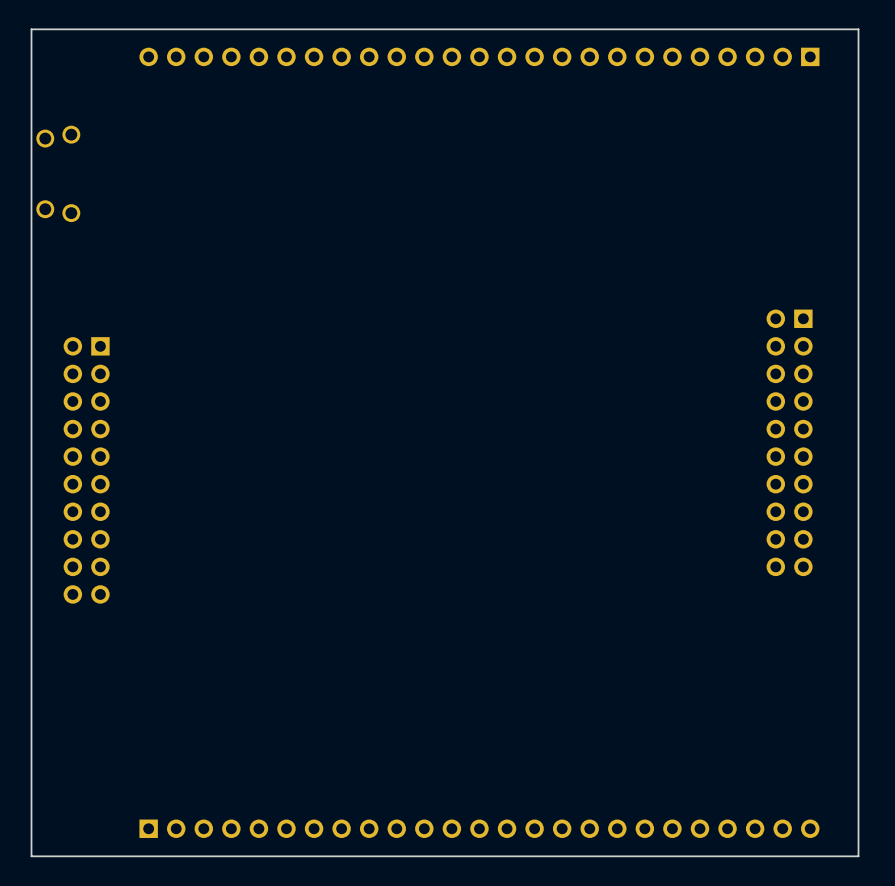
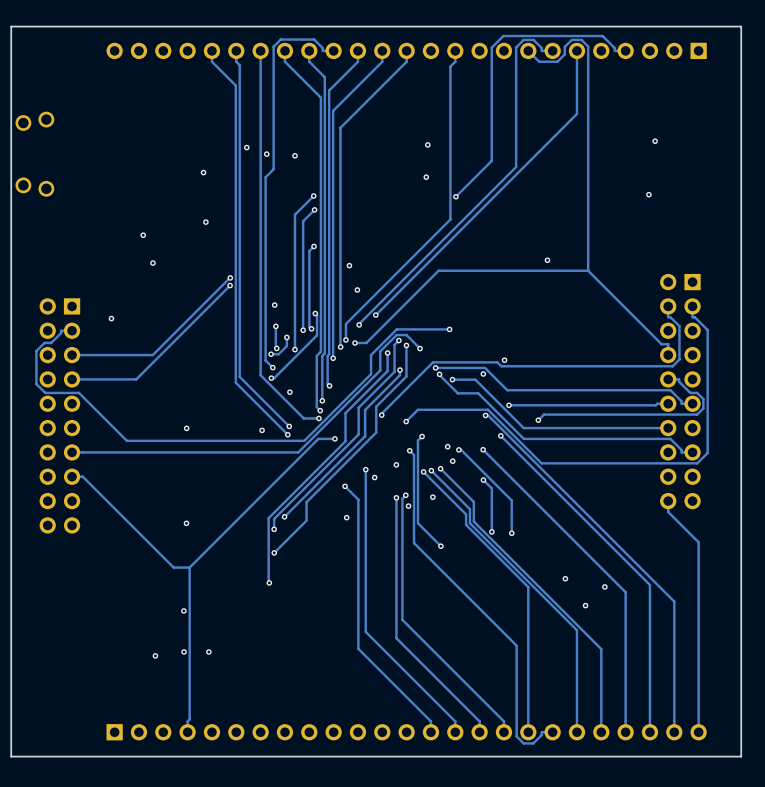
track: none -> (211, 50) (211, 61) (235, 85) (235, 382) (287, 434)
track: none -> (236, 50) (236, 61) (239, 65) (239, 376) (289, 426)
track: none -> (260, 50) (260, 375) (303, 418) (318, 418)
track: none -> (284, 50) (284, 61) (320, 97) (320, 351) (316, 355) (316, 407) (320, 410)
track: none -> (309, 50) (309, 61) (324, 77) (324, 353) (322, 355) (322, 400)
track: none -> (333, 50) (322, 50) (322, 48) (314, 39) (280, 39) (273, 46) (273, 169) (265, 177) (265, 360) (272, 367)
track: none -> (357, 50) (357, 61) (329, 90) (327, 383) (329, 385)
track: none -> (382, 50) (382, 61) (333, 110) (333, 358)
track: none -> (406, 50) (406, 61) (340, 127) (340, 346)
track: none -> (455, 50) (455, 61) (450, 66) (450, 219) (345, 323) (345, 339)
track: none -> (528, 50) (539, 61) (557, 61) (564, 54) (564, 46) (571, 39) (581, 39) (588, 46) (588, 270)
track: none -> (552, 50) (541, 50) (541, 48) (533, 39) (523, 39) (516, 47) (516, 167) (359, 324)
track: none -> (576, 50) (576, 113) (375, 315)
track: none -> (625, 50) (614, 50) (614, 48) (602, 36) (503, 36) (491, 47) (491, 160) (455, 196)
via: none -> (655, 141)
via: none -> (427, 144)
via: none -> (246, 147)
via: none -> (266, 154)
via: none -> (295, 155)
via: none -> (203, 172)
via: none -> (426, 177)
via: none -> (648, 194)
track: none -> (313, 195) (294, 214) (294, 349)
via: none -> (313, 195)
via: none -> (455, 196)
track: none -> (314, 209) (303, 221) (303, 330)
via: none -> (314, 209)
via: none -> (205, 222)
via: none -> (143, 235)
track: none -> (314, 246) (309, 251) (309, 326) (311, 328)
via: none -> (314, 246)
via: none -> (547, 260)
via: none -> (152, 263)
via: none -> (349, 265)
track: none -> (588, 270) (438, 270) (366, 343) (355, 343)
track: none -> (588, 270) (661, 344) (668, 344) (668, 355)
track: none -> (230, 277) (152, 355) (72, 355)
via: none -> (230, 277)
track: none -> (230, 285) (136, 379) (72, 379)
via: none -> (230, 285)
via: none -> (357, 289)
via: none -> (274, 305)
track: none -> (668, 306) (668, 317) (679, 326) (679, 359) (672, 366) (501, 366) (497, 362) (433, 362) (381, 415)
track: none -> (692, 306) (692, 317) (707, 330) (707, 452) (697, 463) (541, 463) (487, 409) (417, 409) (406, 421)
track: none -> (315, 313) (317, 315) (317, 335) (274, 378) (271, 378)
via: none -> (315, 313)
via: none -> (375, 315)
via: none -> (111, 318)
via: none -> (359, 324)
track: none -> (275, 326) (276, 348)
via: none -> (275, 326)
via: none -> (311, 328)
track: none -> (449, 329) (396, 329) (371, 355) (371, 374) (304, 440) (126, 440) (78, 392) (45, 392) (36, 384) (36, 351) (44, 342) (51, 342) (61, 330) (72, 330)
via: none -> (449, 329)
via: none -> (303, 330)
track: none -> (286, 337) (286, 346) (278, 354) (271, 354)
via: none -> (286, 337)
via: none -> (345, 339)
track: none -> (398, 340) (394, 344) (394, 371) (358, 407) (358, 434) (274, 518) (274, 529)
via: none -> (398, 340)
via: none -> (355, 343)
track: none -> (406, 345) (406, 376) (376, 406) (376, 432) (306, 502) (306, 520) (274, 552)
via: none -> (406, 345)
via: none -> (340, 346)
via: none -> (276, 348)
track: none -> (420, 348) (406, 335) (396, 335) (380, 351) (380, 370) (298, 452) (72, 452)
via: none -> (420, 348)
via: none -> (294, 349)
track: none -> (387, 353) (387, 371) (345, 413) (345, 441) (268, 518) (269, 582)
via: none -> (387, 353)
via: none -> (271, 354)
via: none -> (333, 358)
via: none -> (504, 360)
via: none -> (272, 367)
track: none -> (435, 367) (484, 367) (507, 390) (670, 390) (681, 403) (692, 403)
via: none -> (435, 367)
track: none -> (400, 370) (400, 375) (365, 410) (365, 436) (284, 516)
via: none -> (400, 370)
via: none -> (483, 374)
track: none -> (439, 374) (457, 393) (478, 393) (523, 438) (670, 438) (681, 452) (692, 452)
via: none -> (439, 374)
via: none -> (271, 378)
track: none -> (452, 379) (475, 379) (523, 428) (668, 428)
via: none -> (452, 379)
track: none -> (668, 379) (679, 379) (690, 392) (697, 392) (703, 399) (703, 408) (697, 414) (543, 414) (538, 420)
via: none -> (329, 385)
via: none -> (289, 392)
via: none -> (322, 400)
track: none -> (668, 403) (508, 405)
via: none -> (508, 405)
via: none -> (320, 410)
via: none -> (381, 415)
track: none -> (485, 415) (488, 415) (674, 601) (674, 732)
via: none -> (485, 415)
via: none -> (318, 418)
via: none -> (538, 420)
via: none -> (406, 421)
via: none -> (289, 426)
via: none -> (186, 428)
via: none -> (262, 430)
via: none -> (287, 434)
track: none -> (500, 435) (649, 585) (649, 732)
via: none -> (500, 435)
track: none -> (422, 436) (417, 440) (417, 523) (440, 546)
via: none -> (422, 436)
track: none -> (334, 438) (318, 438) (189, 567)
via: none -> (334, 438)
via: none -> (447, 446)
track: none -> (458, 449) (461, 449) (511, 500) (511, 533)
via: none -> (458, 449)
track: none -> (483, 449) (625, 592) (625, 732)
via: none -> (483, 449)
track: none -> (409, 450) (414, 455) (414, 543) (516, 645) (516, 736) (523, 743) (533, 743) (541, 734) (541, 732) (552, 732)
via: none -> (409, 450)
via: none -> (452, 461)
via: none -> (396, 464)
track: none -> (440, 468) (473, 502) (473, 521) (601, 649) (601, 732)
via: none -> (440, 468)
track: none -> (365, 469) (365, 631) (455, 721) (455, 732)
via: none -> (365, 469)
track: none -> (431, 470) (469, 509) (469, 523) (576, 630) (576, 732)
via: none -> (431, 470)
track: none -> (423, 471) (466, 514) (466, 524) (528, 587) (528, 732)
via: none -> (423, 471)
track: none -> (72, 476) (82, 476) (173, 567) (189, 567)
via: none -> (374, 477)
track: none -> (483, 480) (491, 488) (491, 531)
via: none -> (483, 480)
track: none -> (345, 486) (358, 499) (358, 648) (430, 721) (430, 732)
via: none -> (345, 486)
track: none -> (405, 495) (402, 498) (402, 619) (503, 721) (503, 732)
via: none -> (405, 495)
via: none -> (432, 497)
track: none -> (396, 497) (396, 638) (479, 721) (479, 732)
via: none -> (396, 497)
track: none -> (668, 501) (668, 511) (698, 542) (698, 732)
via: none -> (408, 506)
via: none -> (284, 516)
via: none -> (346, 517)
via: none -> (186, 523)
via: none -> (274, 529)
via: none -> (491, 531)
via: none -> (511, 533)
via: none -> (440, 546)
via: none -> (274, 552)
track: none -> (189, 567) (189, 719) (187, 721) (187, 732)
via: none -> (565, 578)
via: none -> (269, 582)
via: none -> (604, 586)
via: none -> (585, 605)
via: none -> (183, 610)
via: none -> (184, 651)
via: none -> (208, 651)
via: none -> (155, 655)

